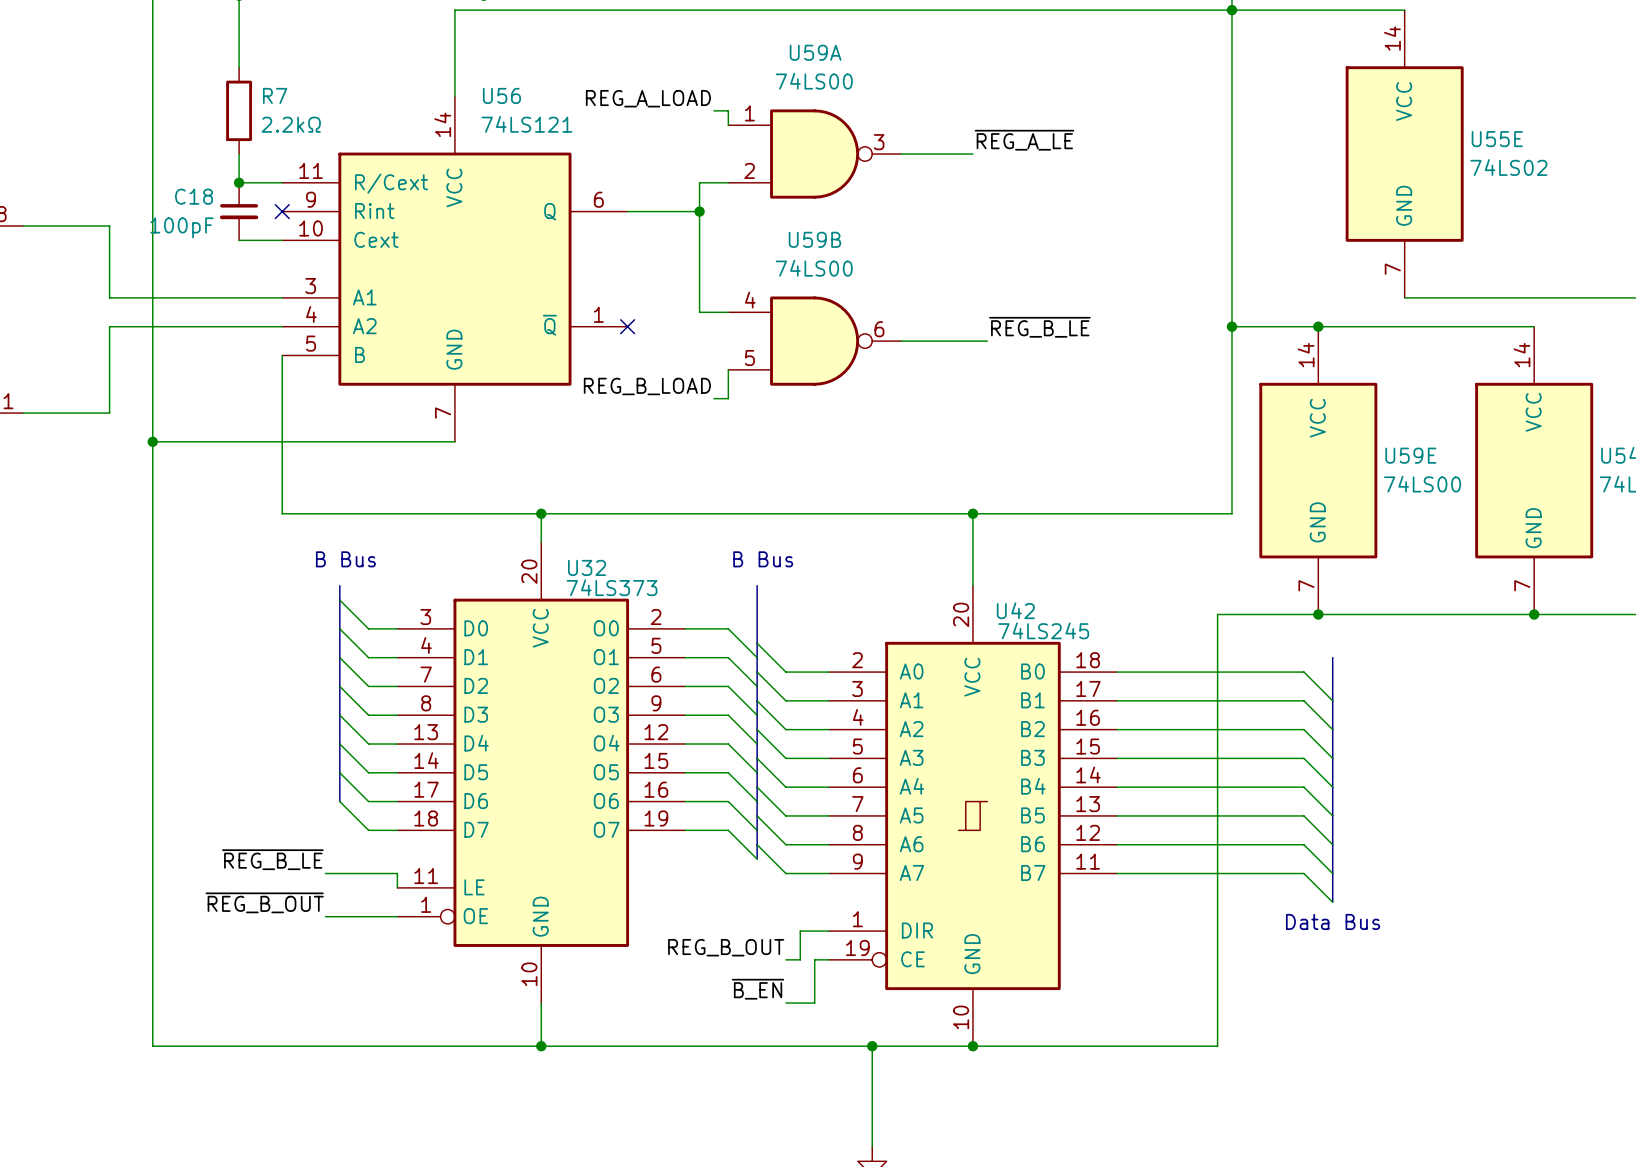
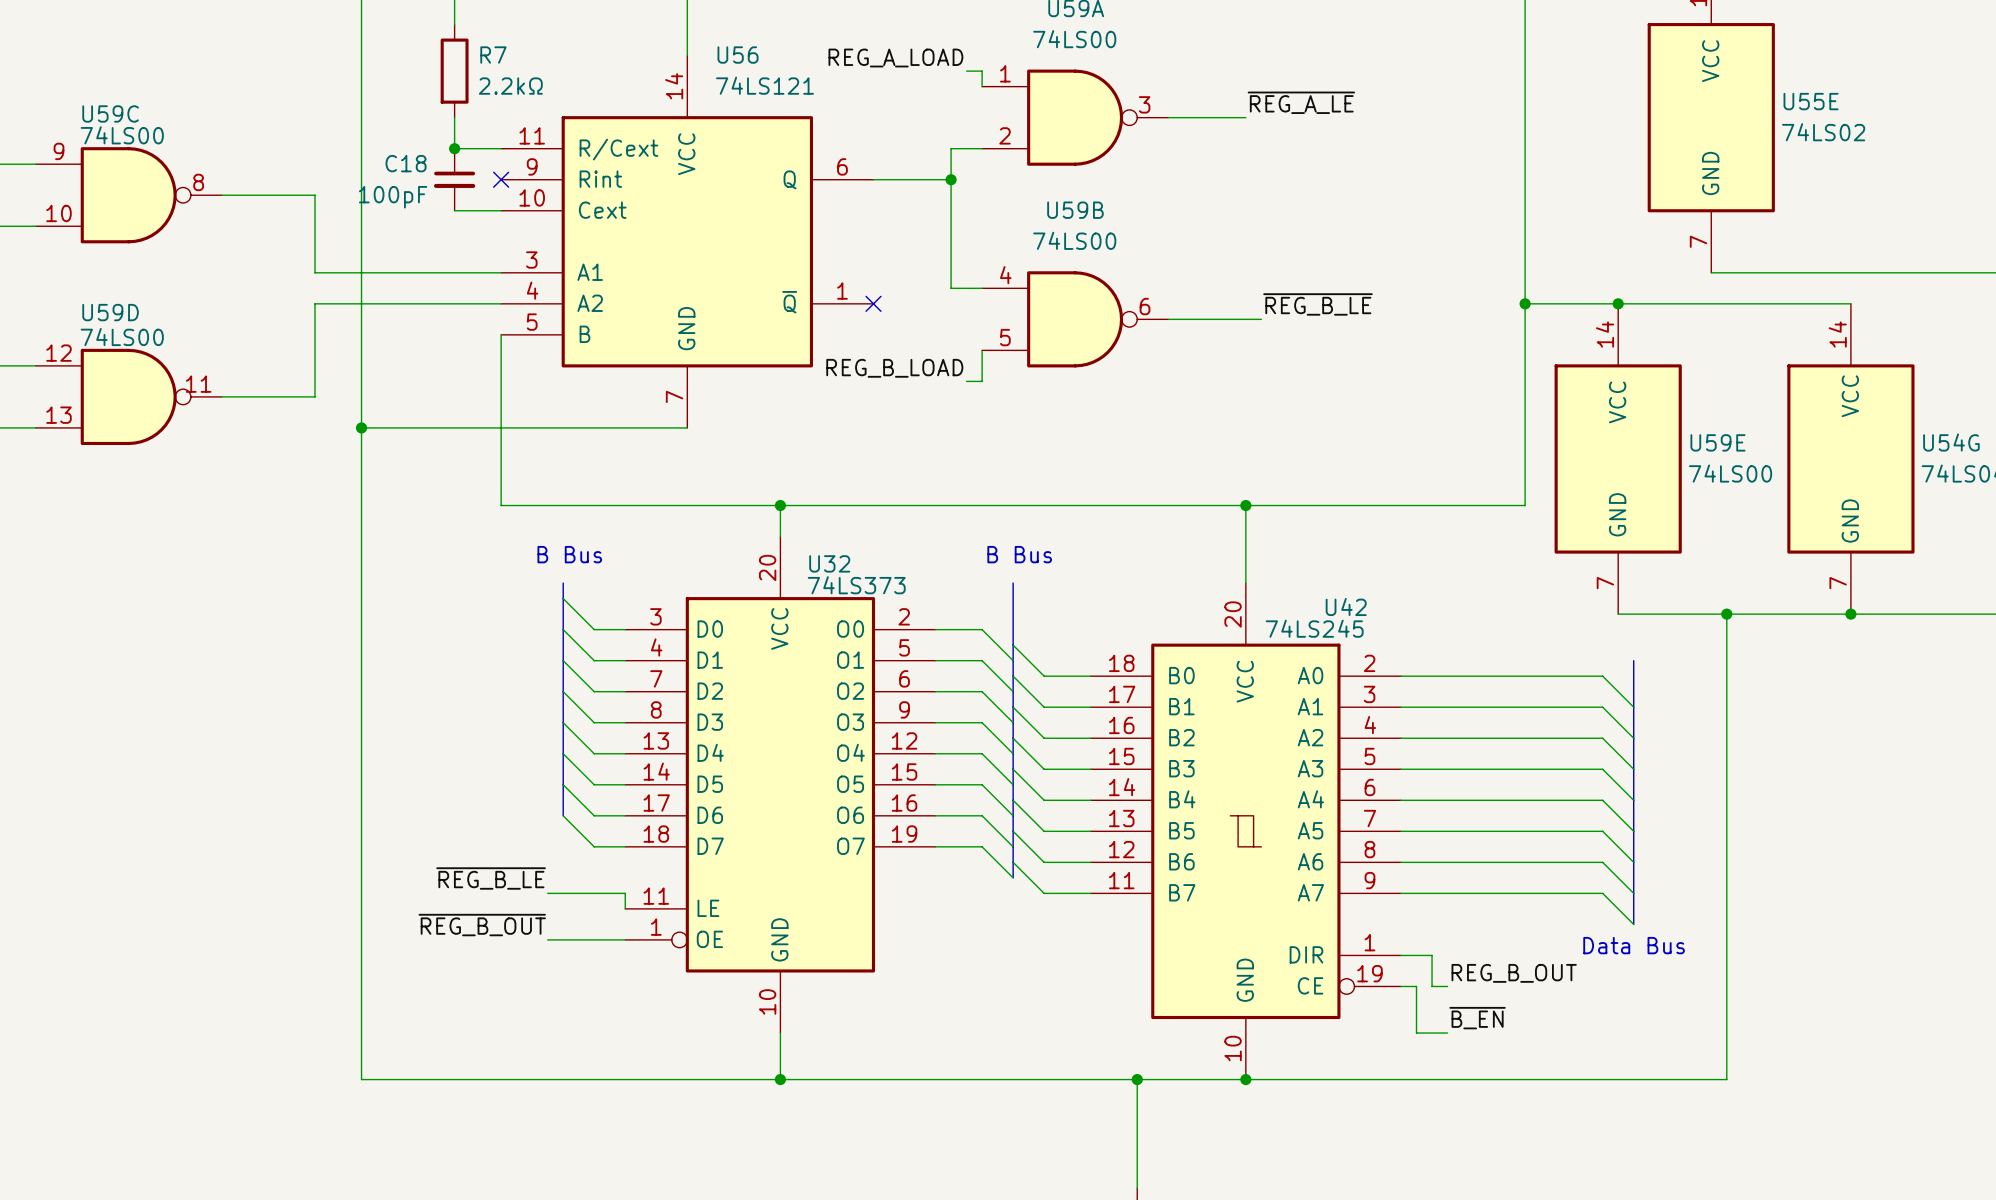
U42 name position: U42 (1015, 610) -> U42 (1346, 606)
wire: (1318, 614) (1217, 614) (1217, 1046) -> (1726, 614) (1726, 1079) (1509, 1079)
junction: (1318, 614) -> none
junction: none -> (1726, 614)
U42 flip: as is (972, 815) -> left-right (1245, 831)
wire: (829, 931) (800, 931) (800, 959) (785, 959) -> none
wire: none -> (1400, 955) (1432, 955) (1432, 986) (1447, 986)
label: REG_B_OUT (726, 947) -> none
label: none -> REG_B_OUT (1514, 973)
wire: (829, 959) (814, 959) (814, 1003) (785, 1003) -> none
wire: none -> (1400, 986) (1416, 986) (1416, 1033) (1447, 1033)
label: ~{B_EN} (758, 989) -> none
label: none -> ~{B_EN} (1477, 1018)

